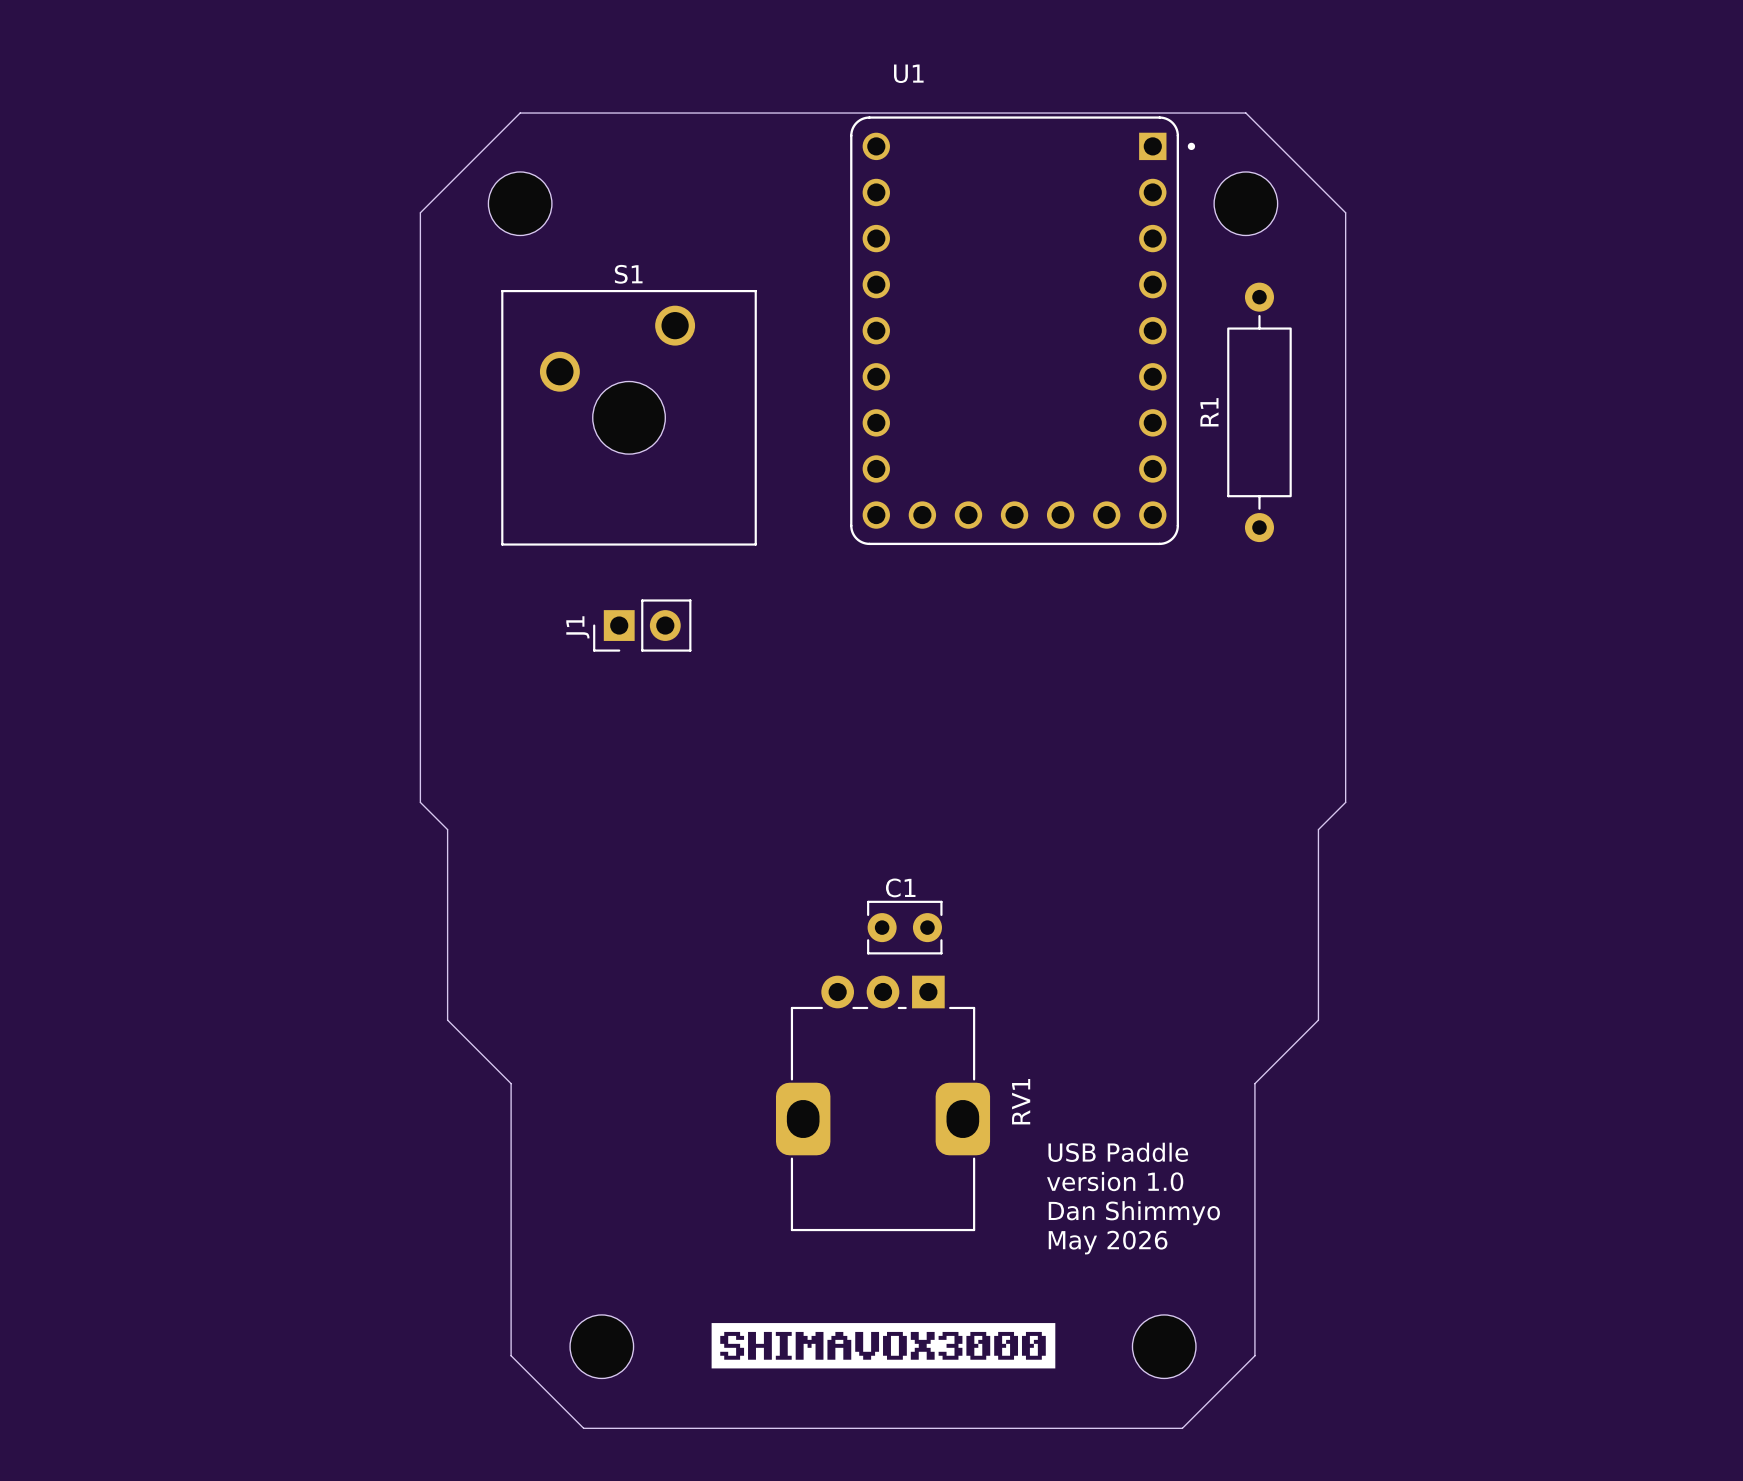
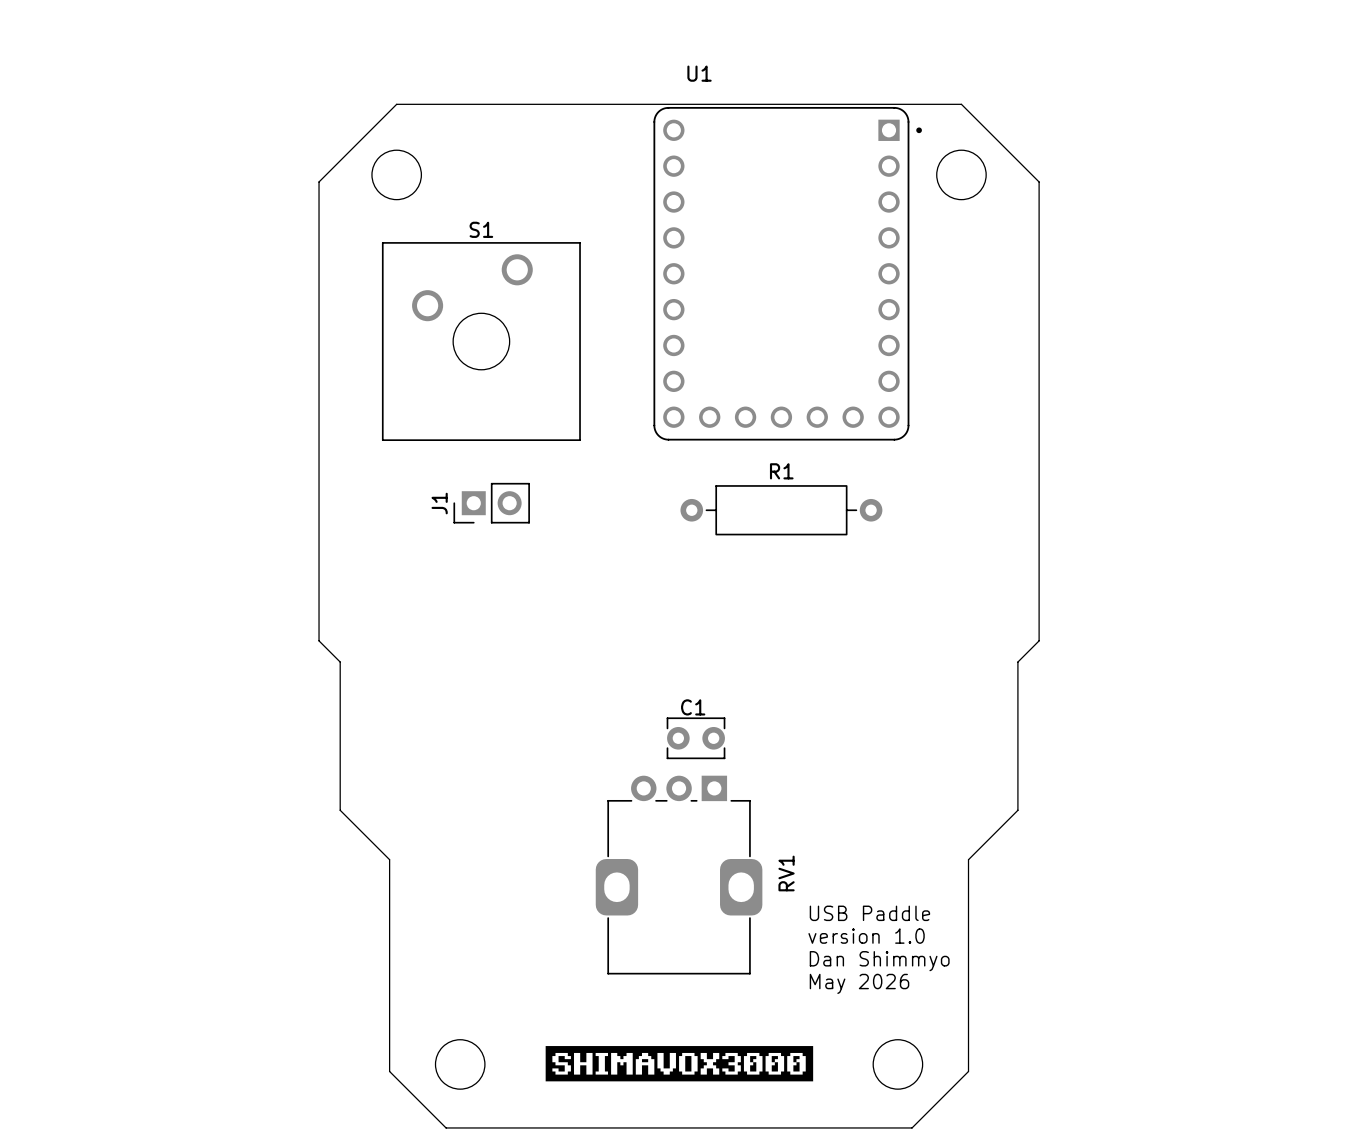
R1 rotation: 0° (1259, 412) -> 90° clockwise (781, 510)
R1 position: (1259, 412) -> (781, 510)

